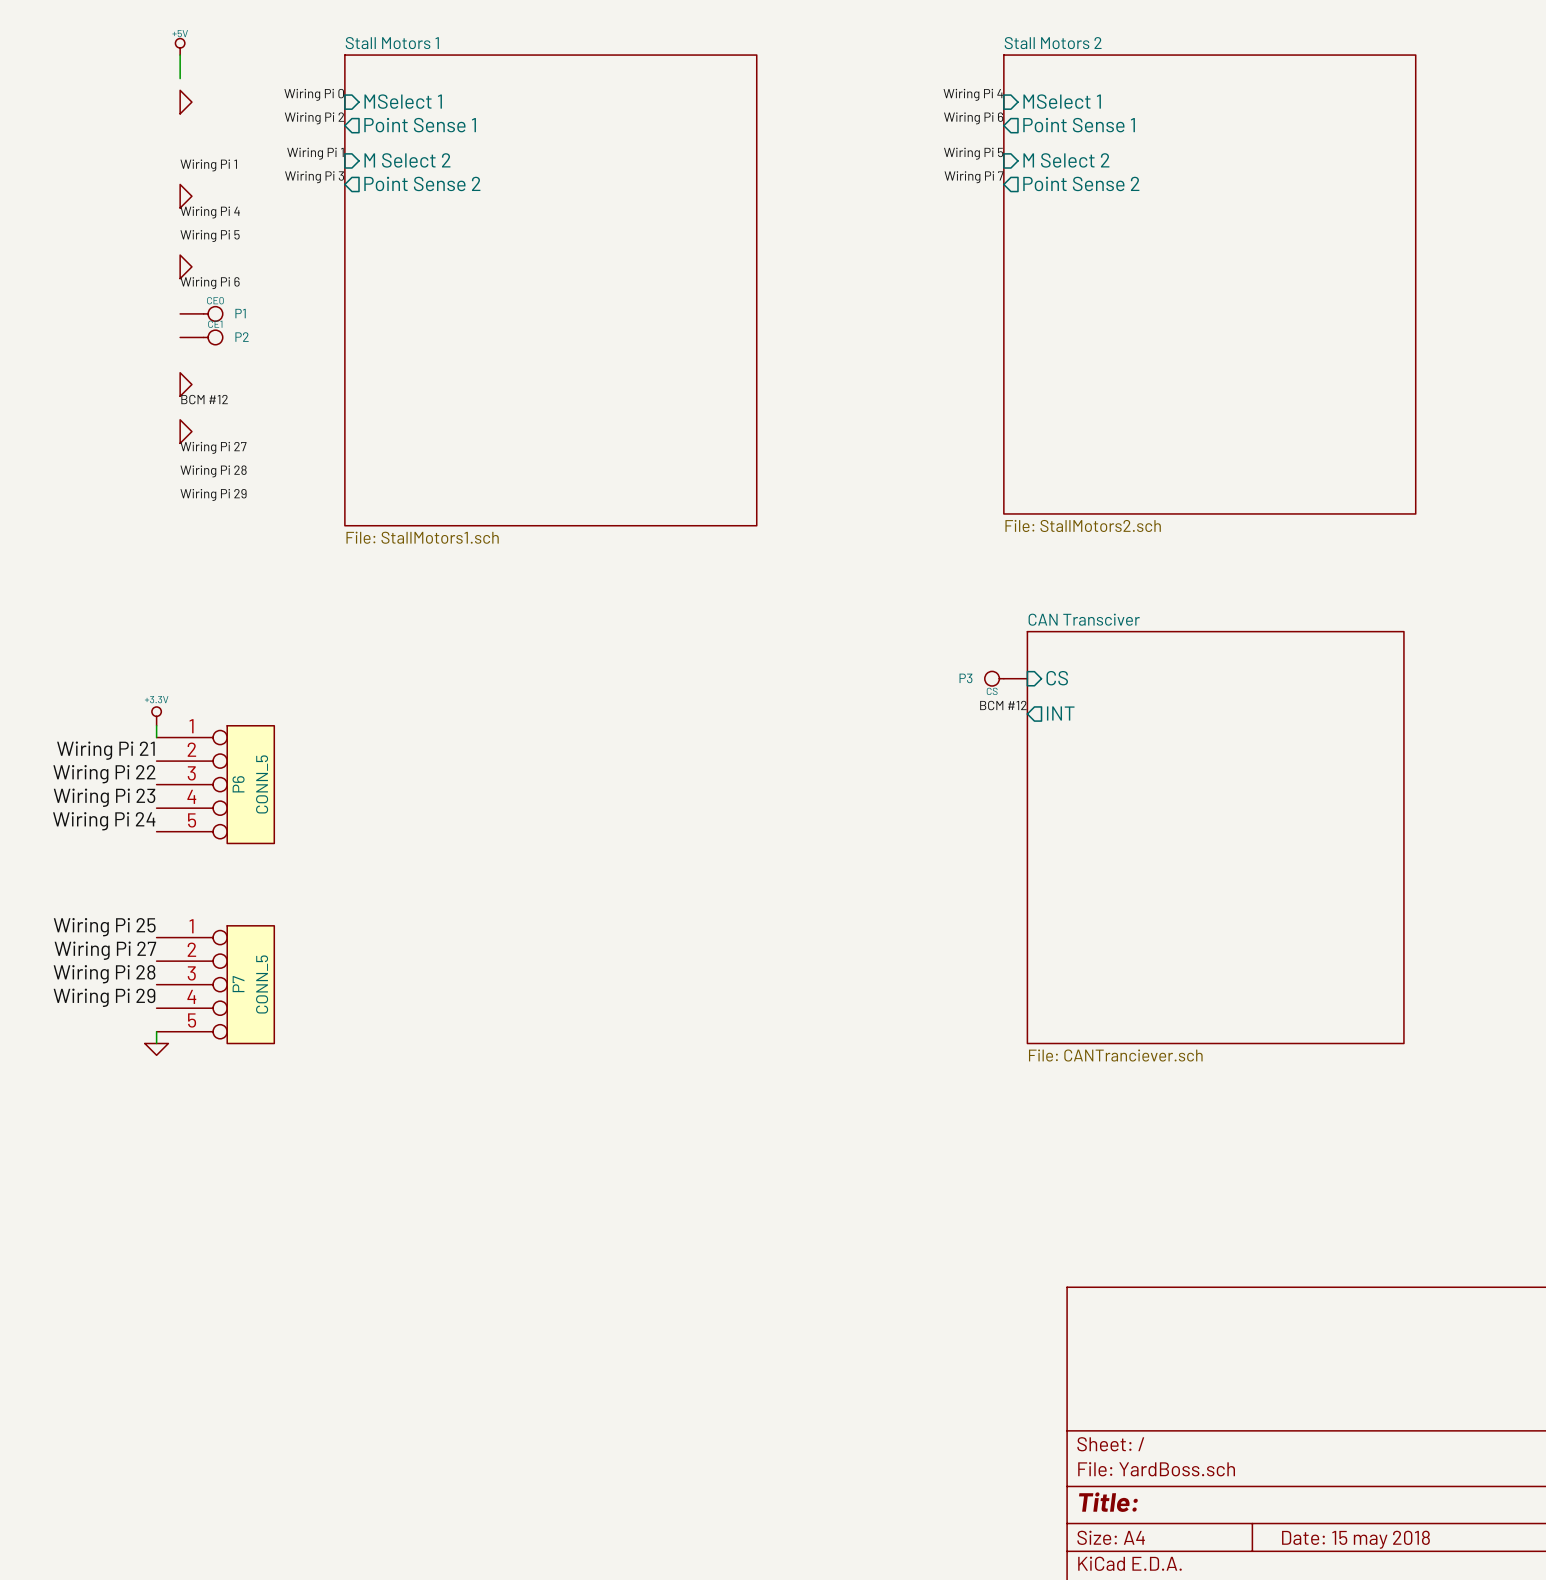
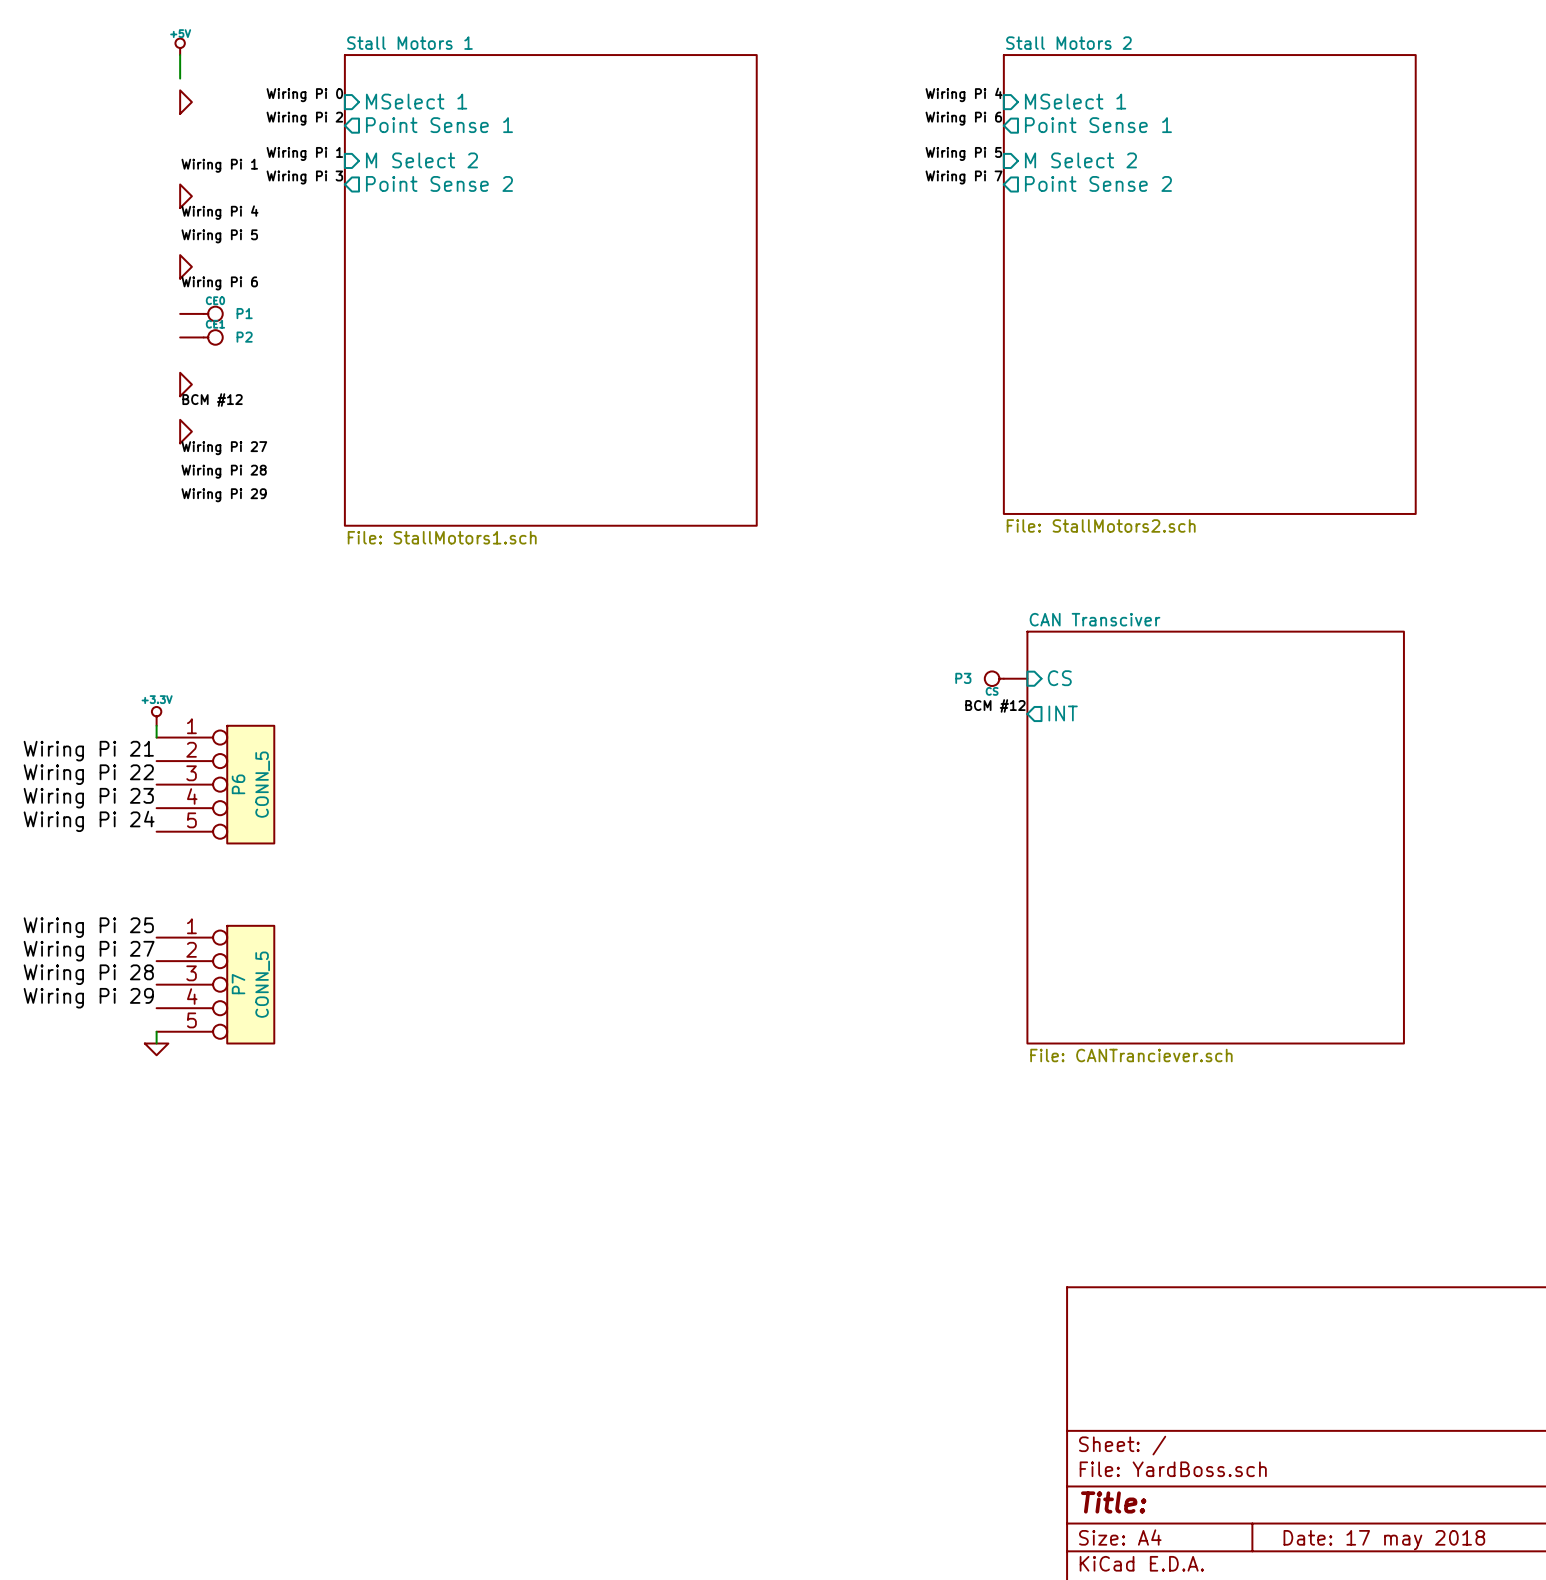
title block: Date: 15 may 2018 (1355, 1539) -> Date: 17 may 2018 (1384, 1540)

